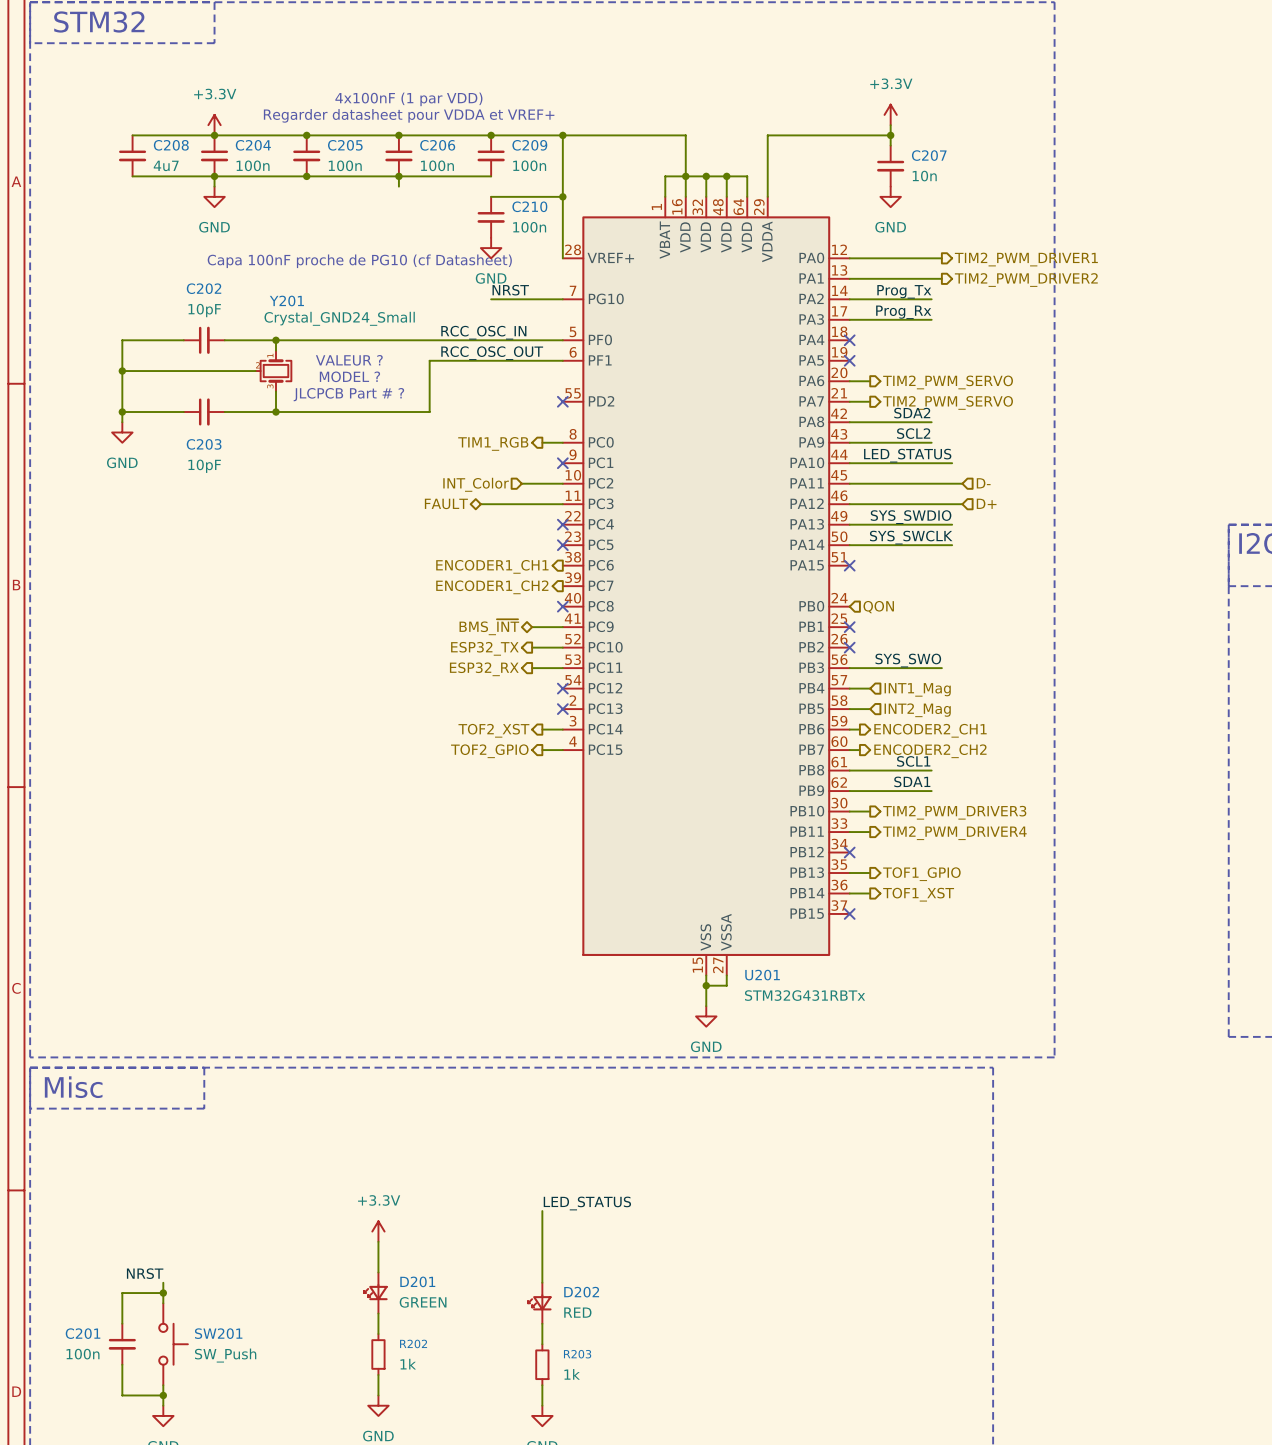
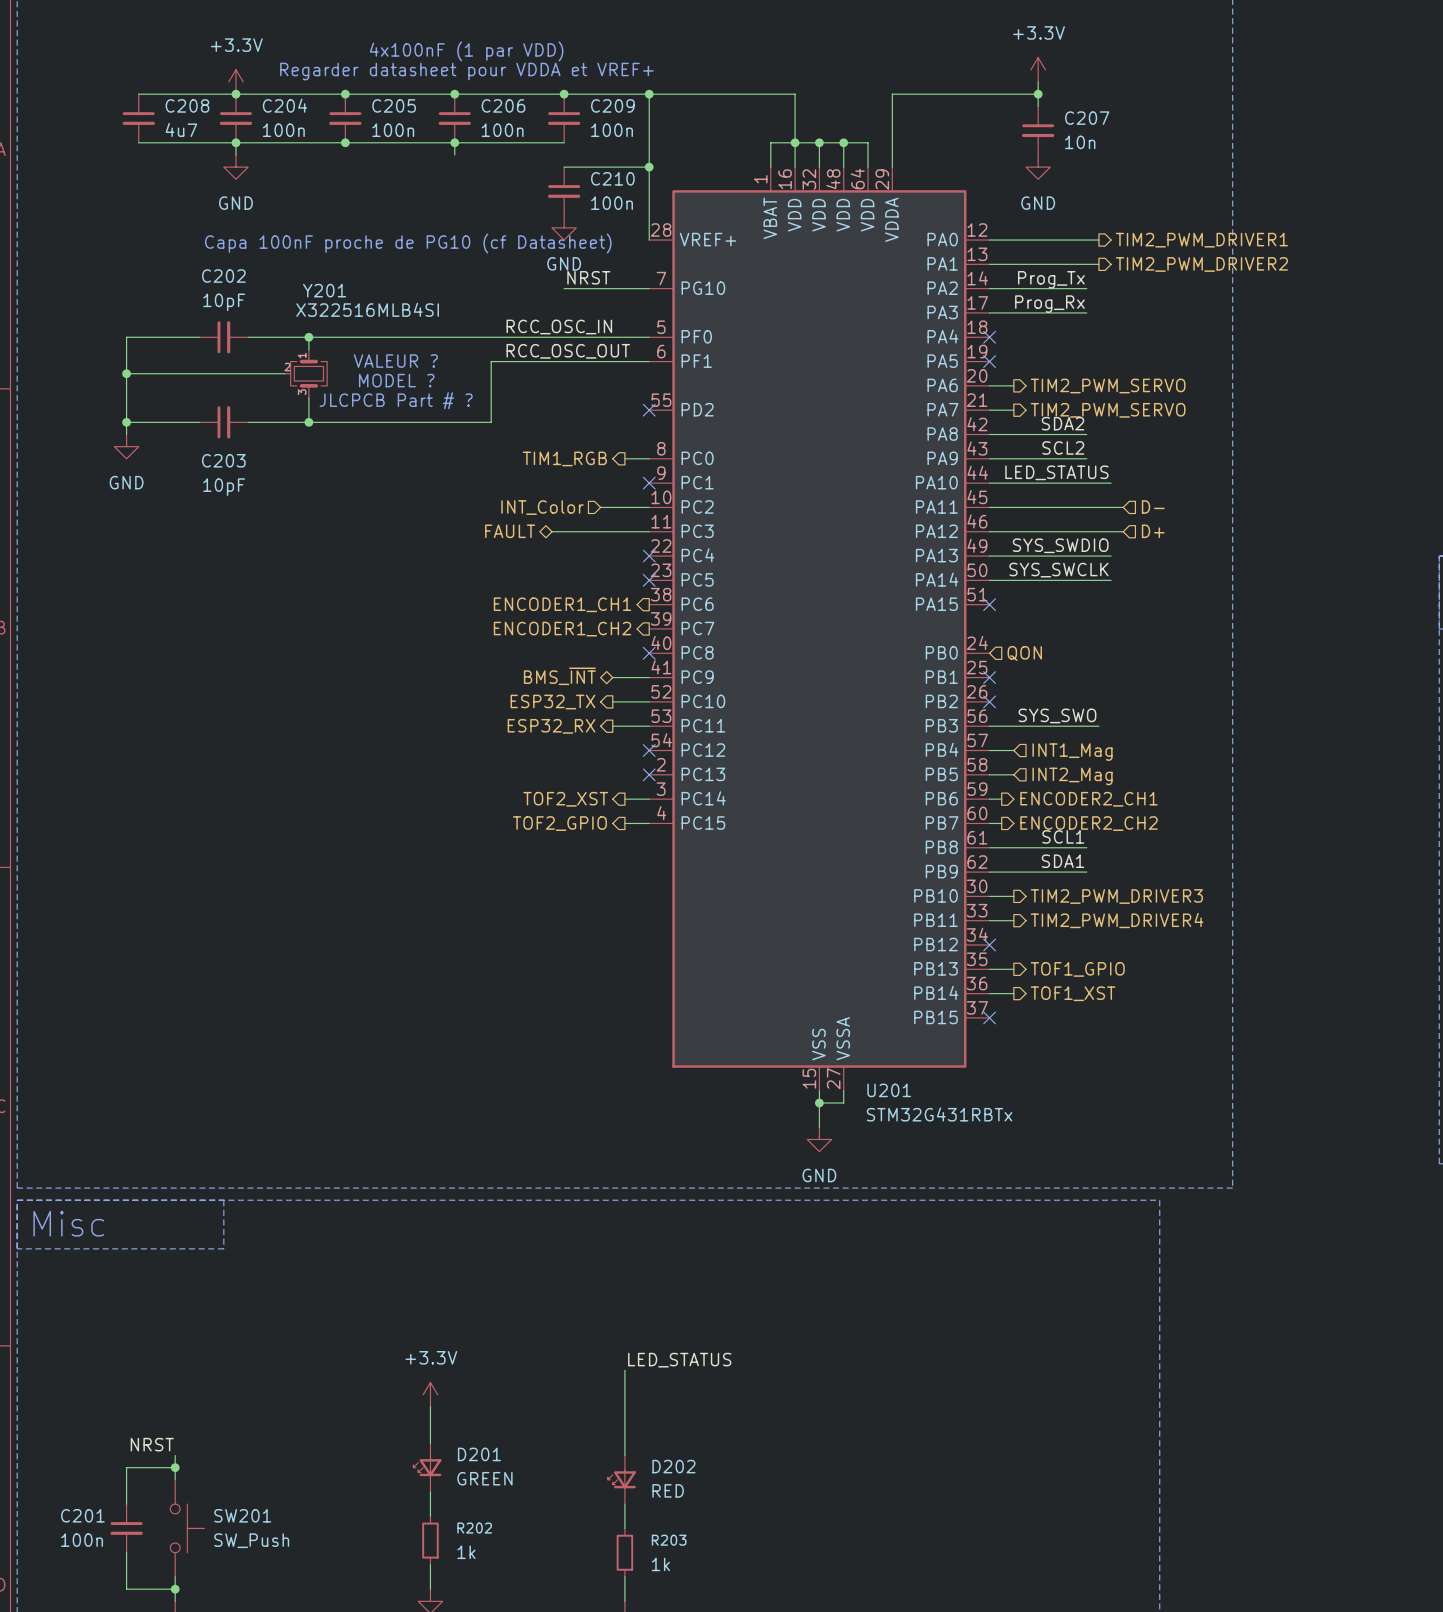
Y201 value: Crystal_GND24_Small (339, 318) -> X322516MLB4SI (367, 309)

